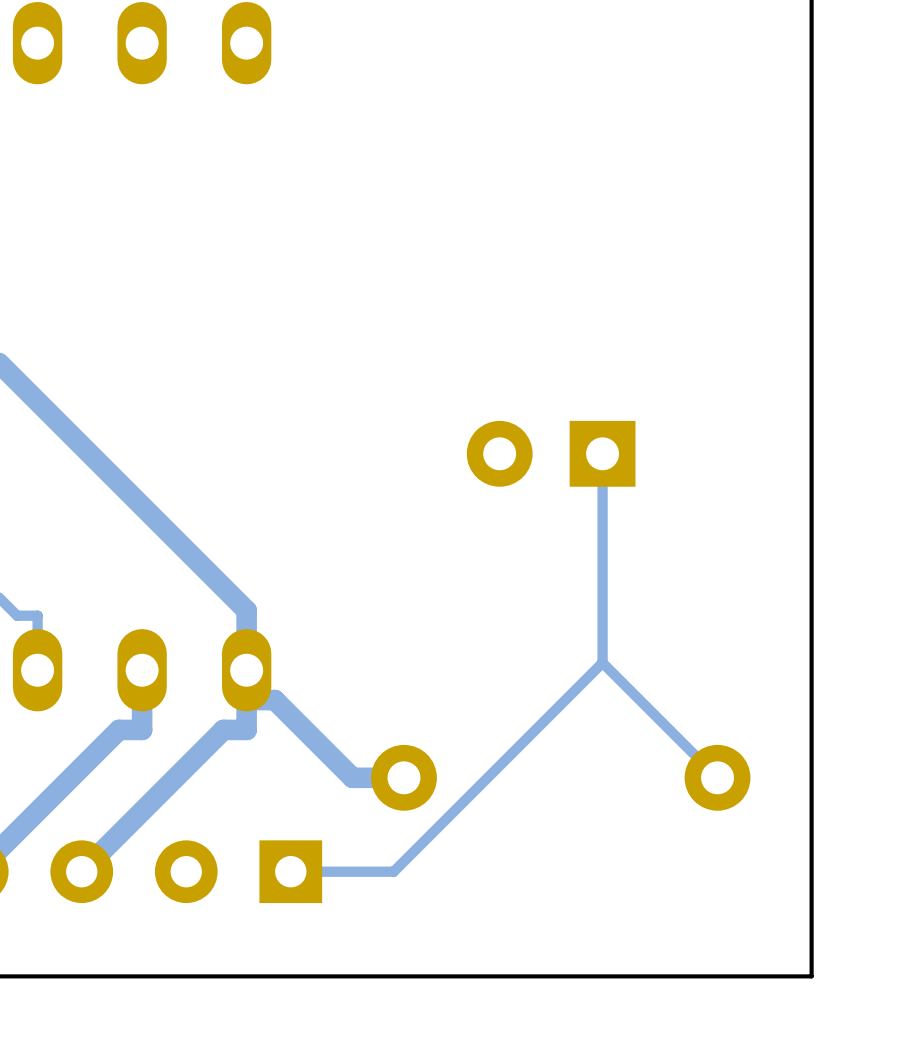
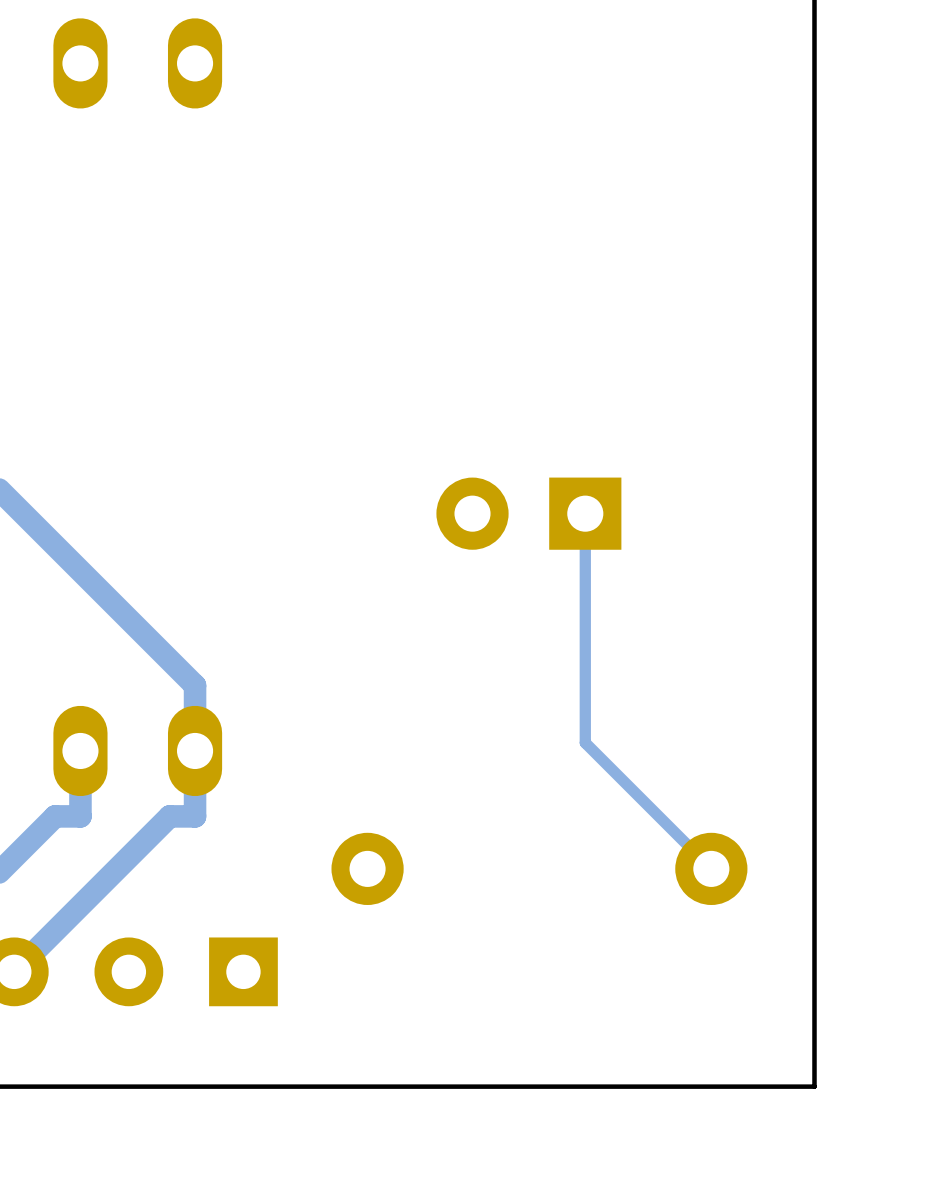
track: (602, 662) (393, 871) (290, 871) -> none
track: (246, 700) (274, 700) (352, 777) (403, 777) -> none

